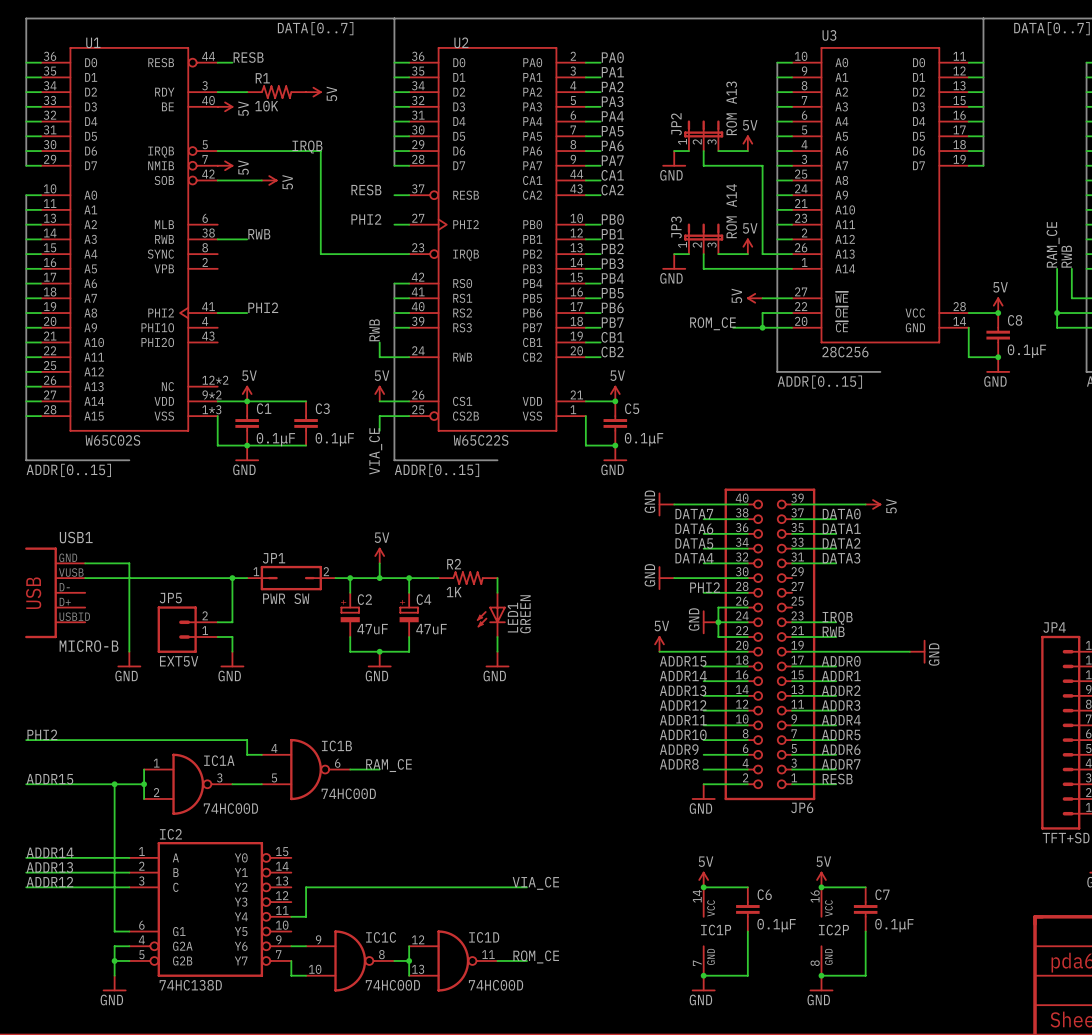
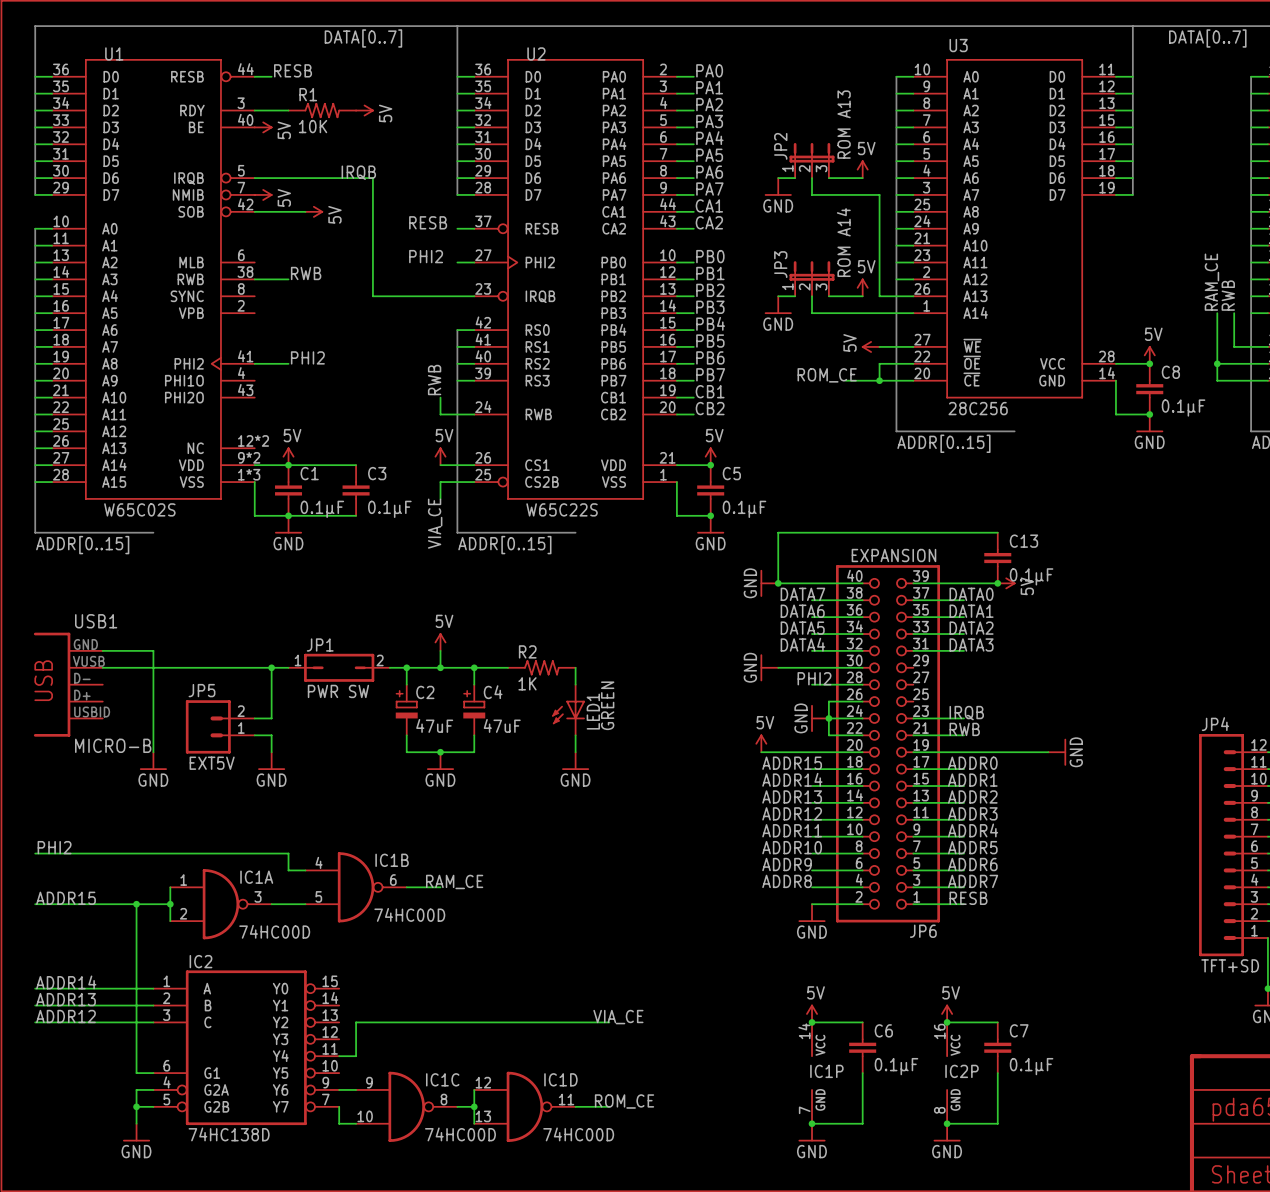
wire: none -> (997, 532) (778, 532) (778, 583)
JP6 value: none -> EXPANSION (893, 555)
C13: none -> 0.1μF (997, 558)
junction: none -> (778, 583)
junction: none -> (997, 583)

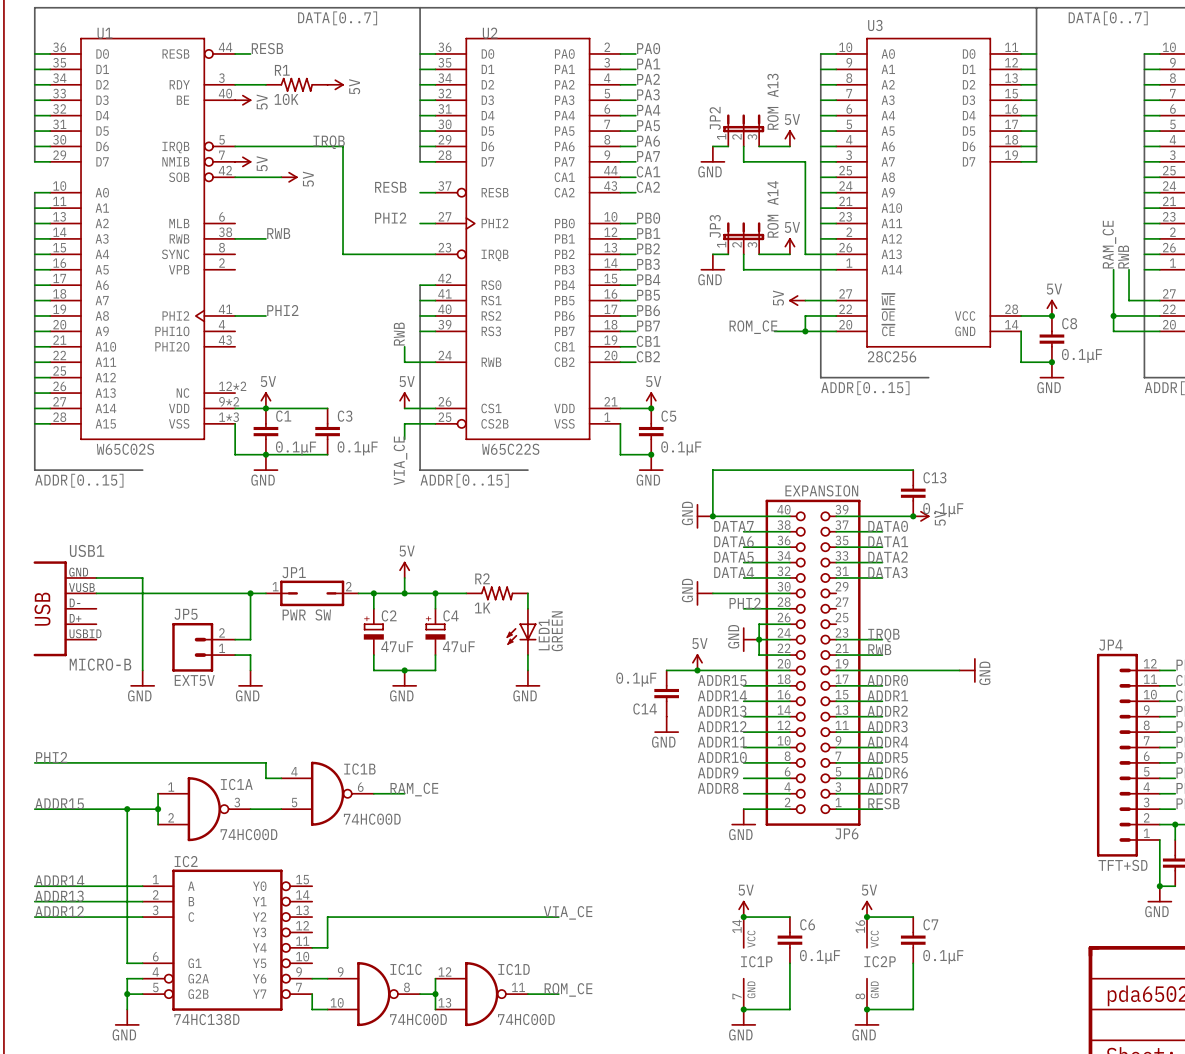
wire: none -> (666, 670) (697, 670)
junction: none -> (697, 670)
C14: none -> 0.1μF (666, 693)
power symbol: none -> GND (666, 724)

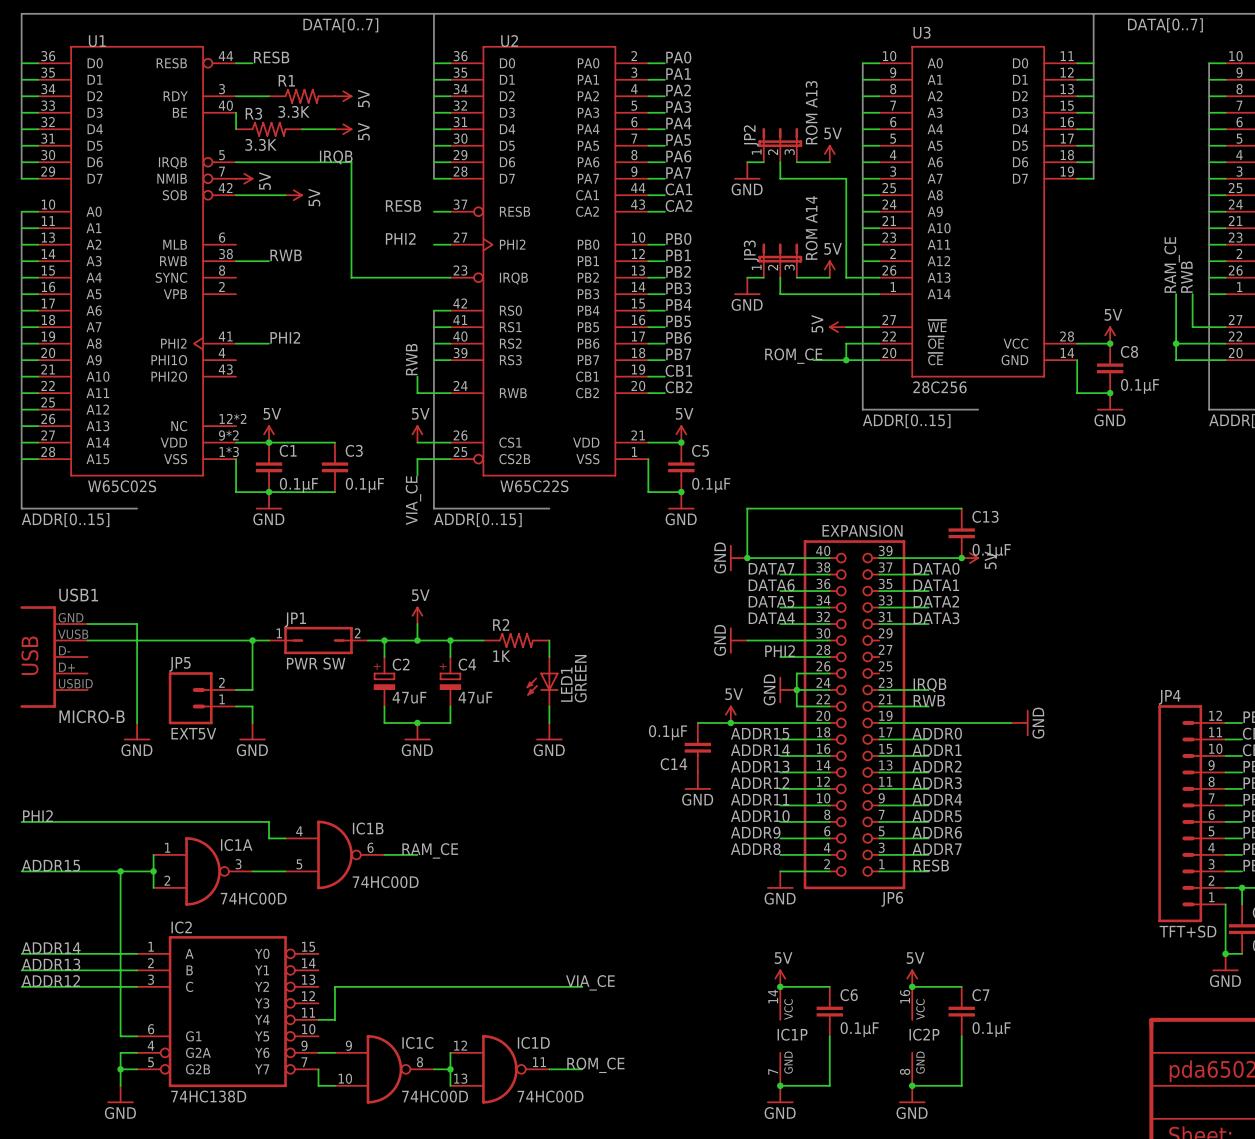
R1 value: 10K (286, 99) -> 3.3K (293, 111)
wire: none -> (236, 112) (236, 129)
power symbol position: 5V (243, 100) -> 5V (343, 129)
R3: none -> 3.3K (269, 129)
wire: none -> (302, 129) (335, 129)

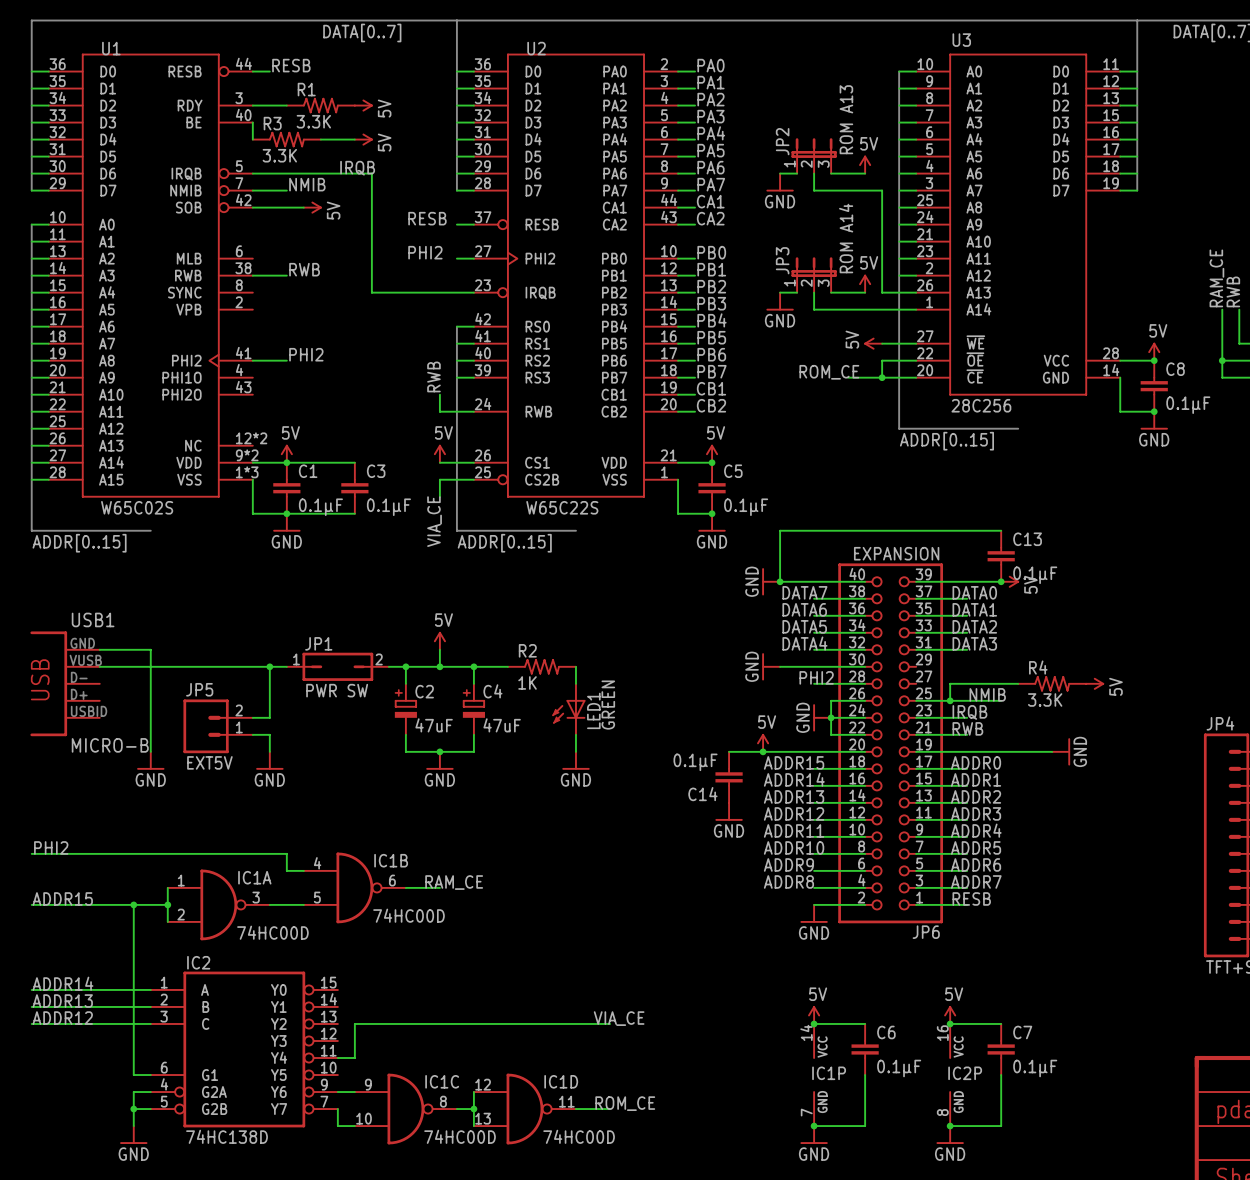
label: none -> NMIB (307, 184)
power symbol: 5V (244, 178) -> none
wire: none -> (1018, 683) (950, 683) (950, 700)
R4: none -> 3.3K (1052, 683)
power symbol: none -> 5V (1095, 683)
label: none -> NMIB (987, 694)
wire: none -> (916, 700) (1001, 700)
junction: none -> (950, 700)

